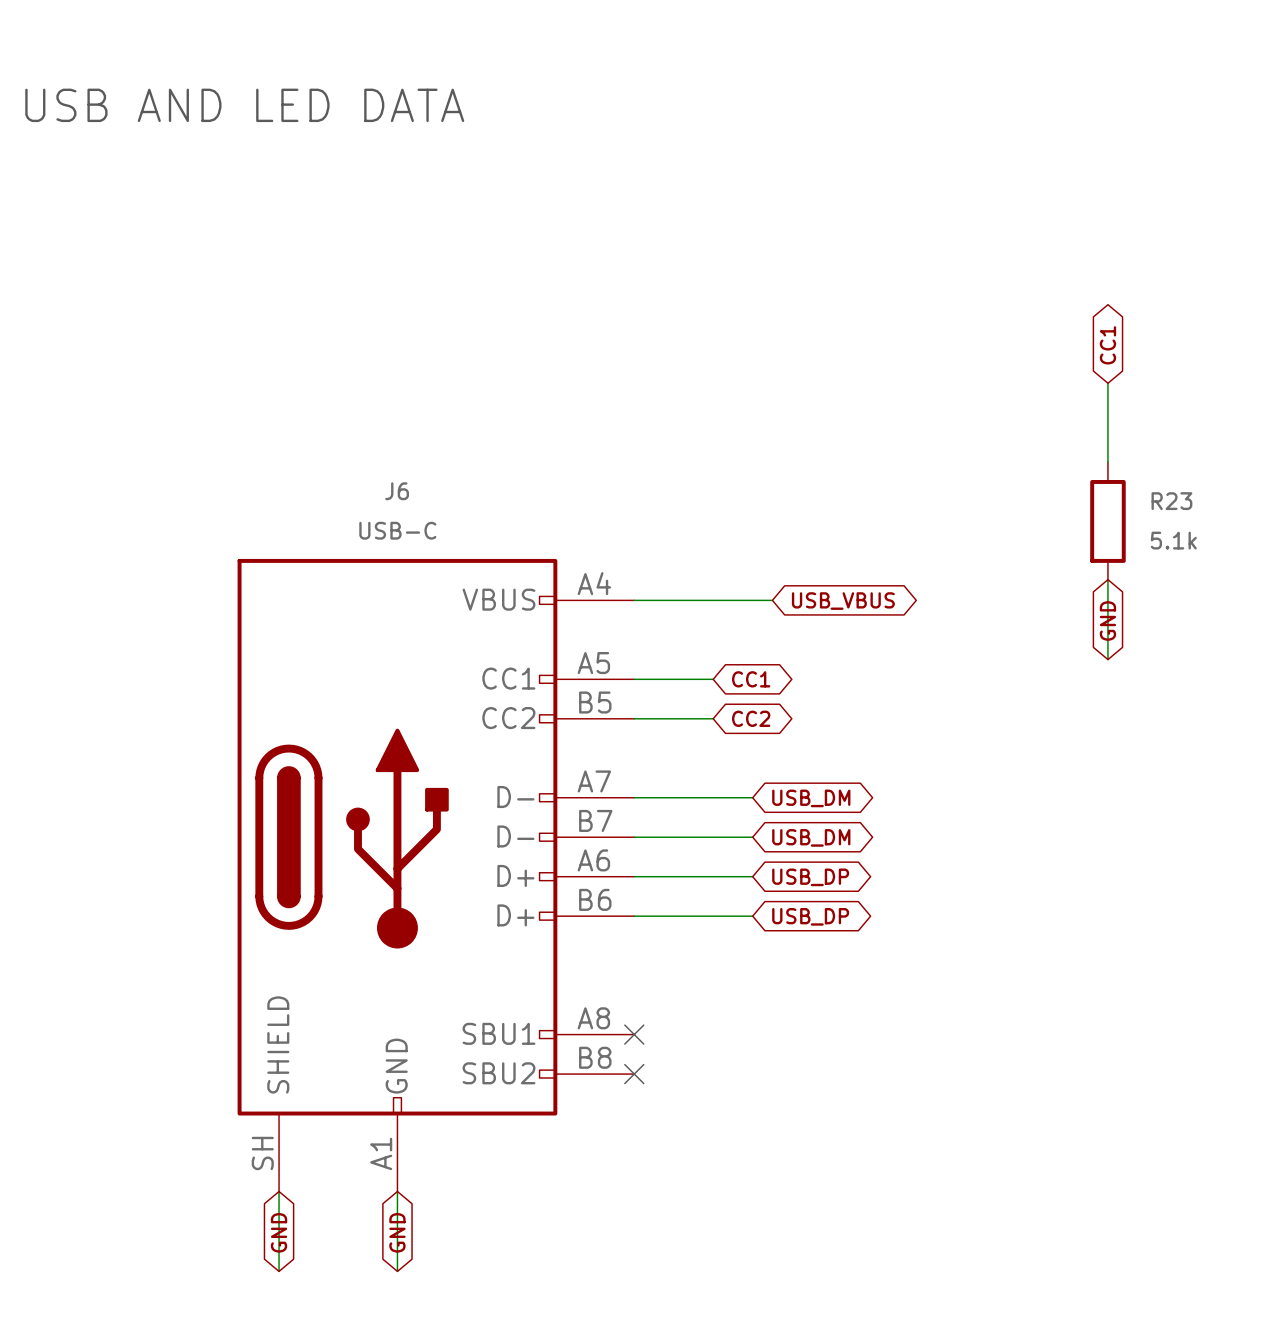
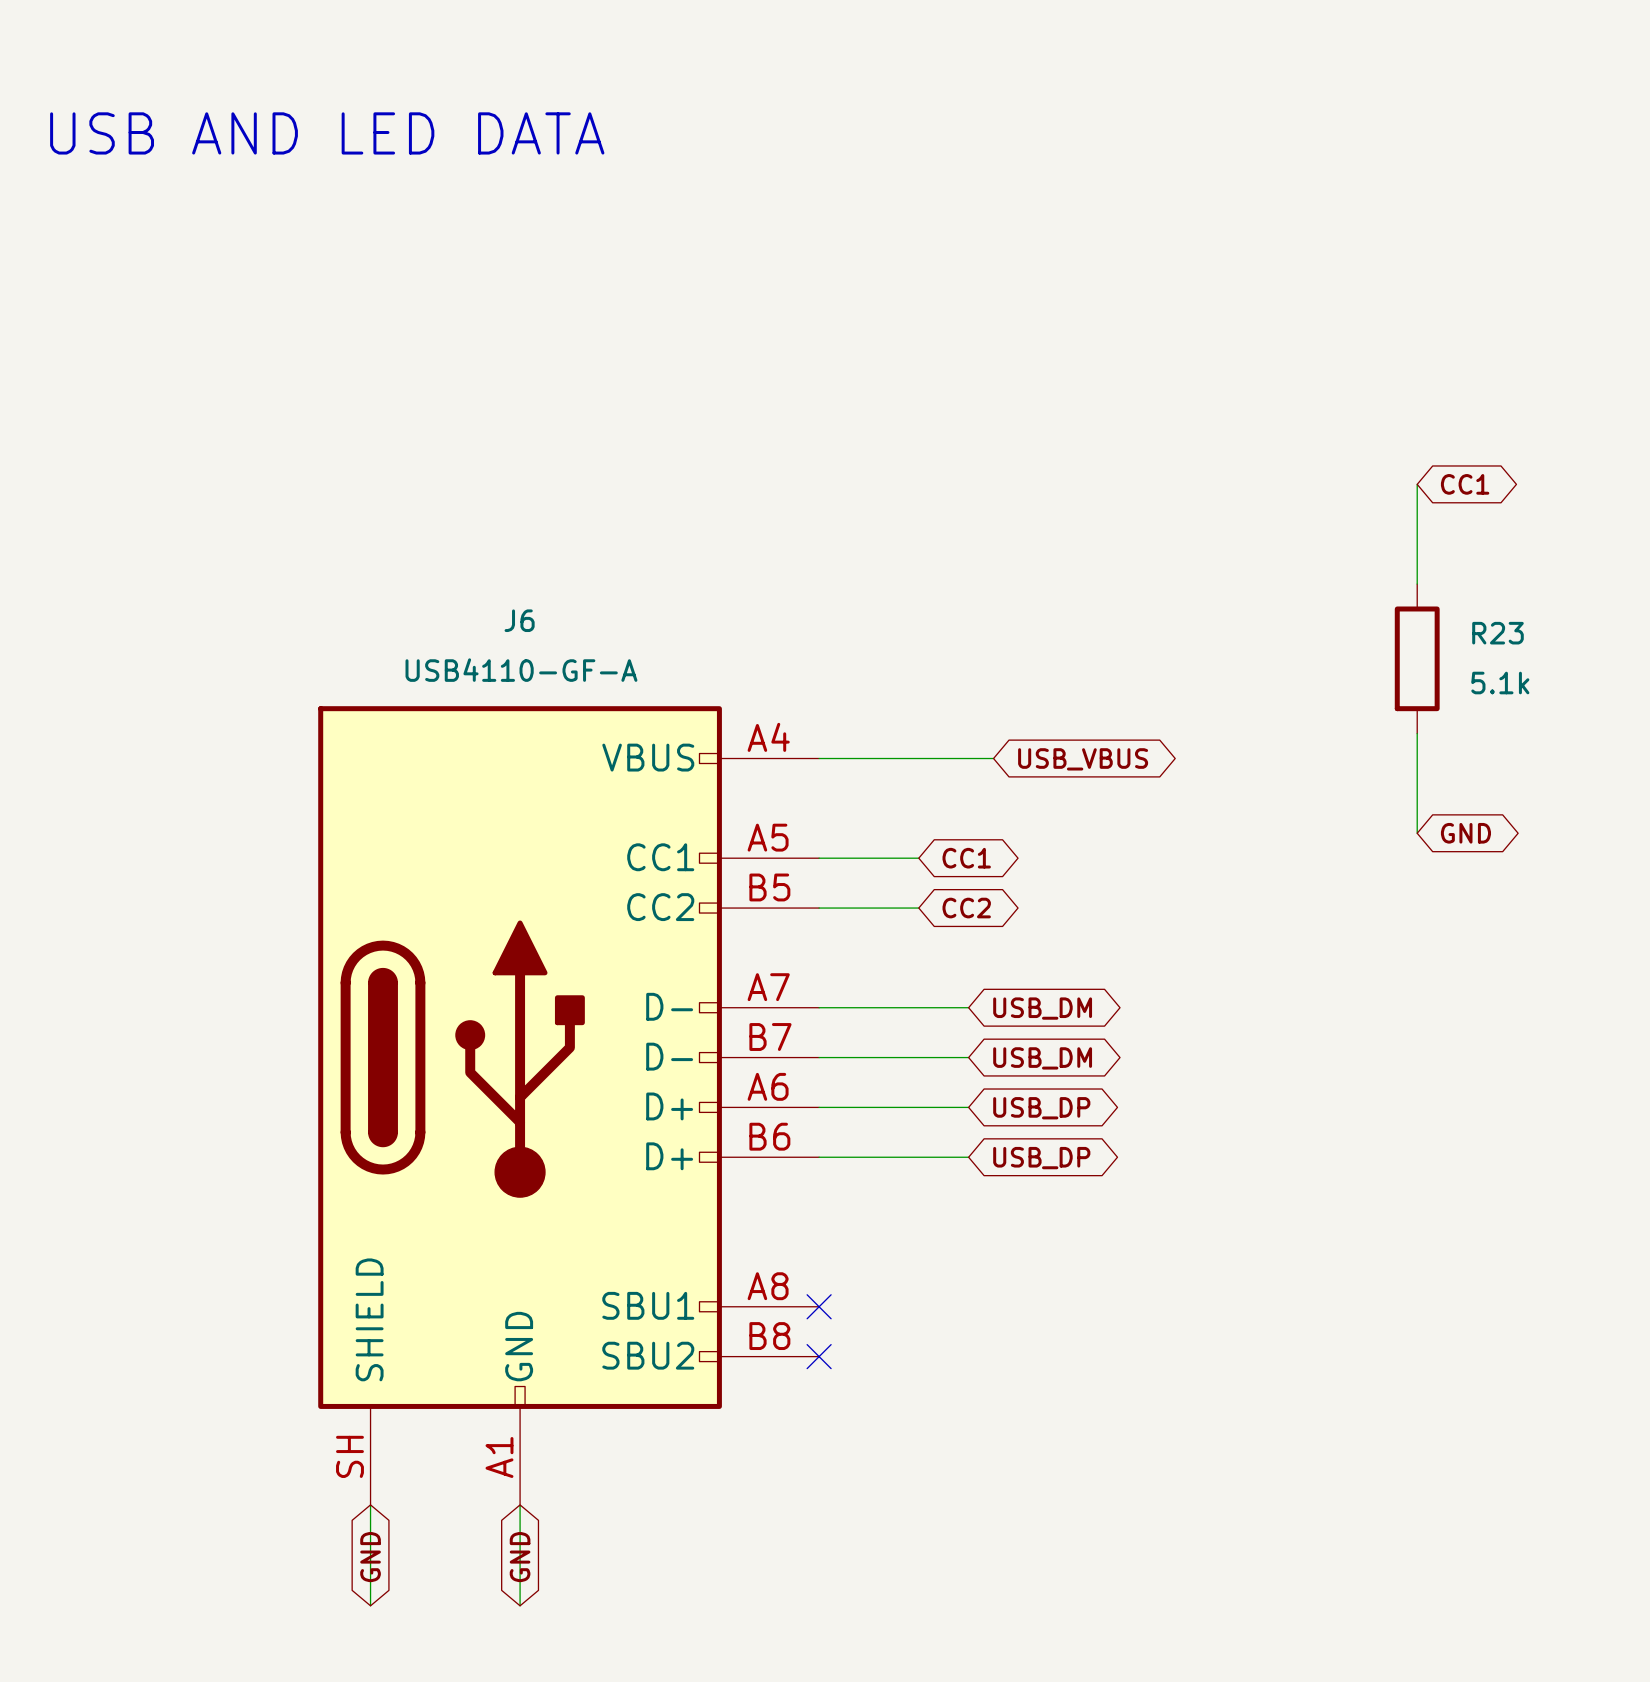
global label rotation: 0° (1107, 345) -> 90° clockwise (1465, 484)
J6 value: USB-C (397, 530) -> USB4110-GF-A (521, 670)
global label rotation: 0° (1107, 620) -> 90° clockwise (1465, 833)

